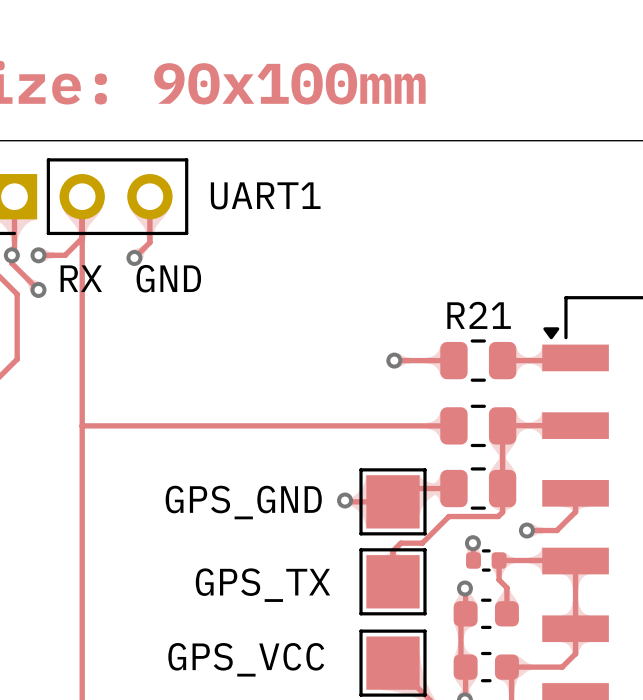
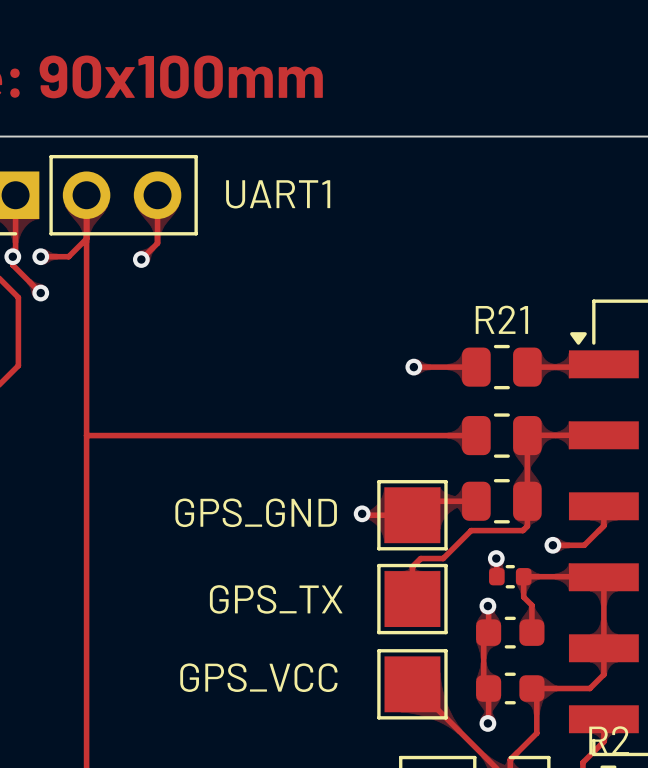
text: RX (81, 278) -> none
text: GND (168, 278) -> none

